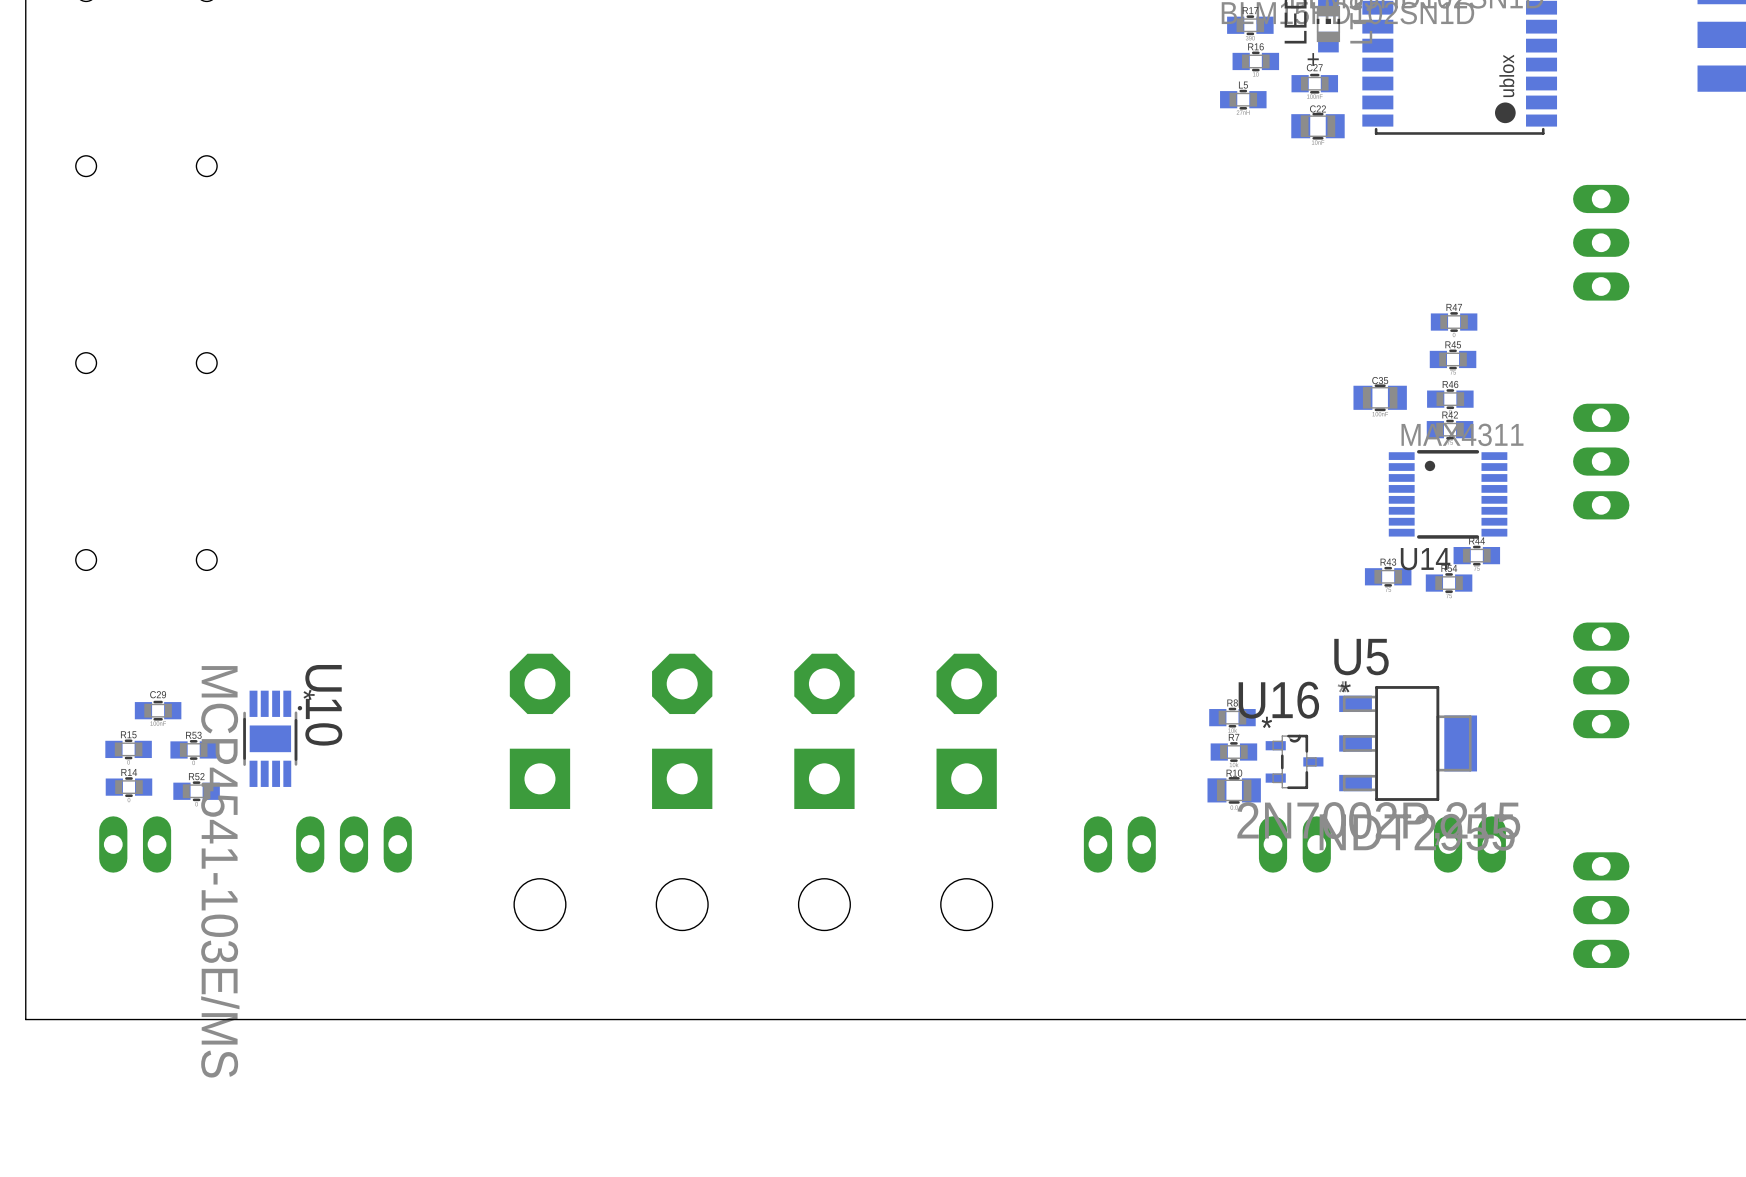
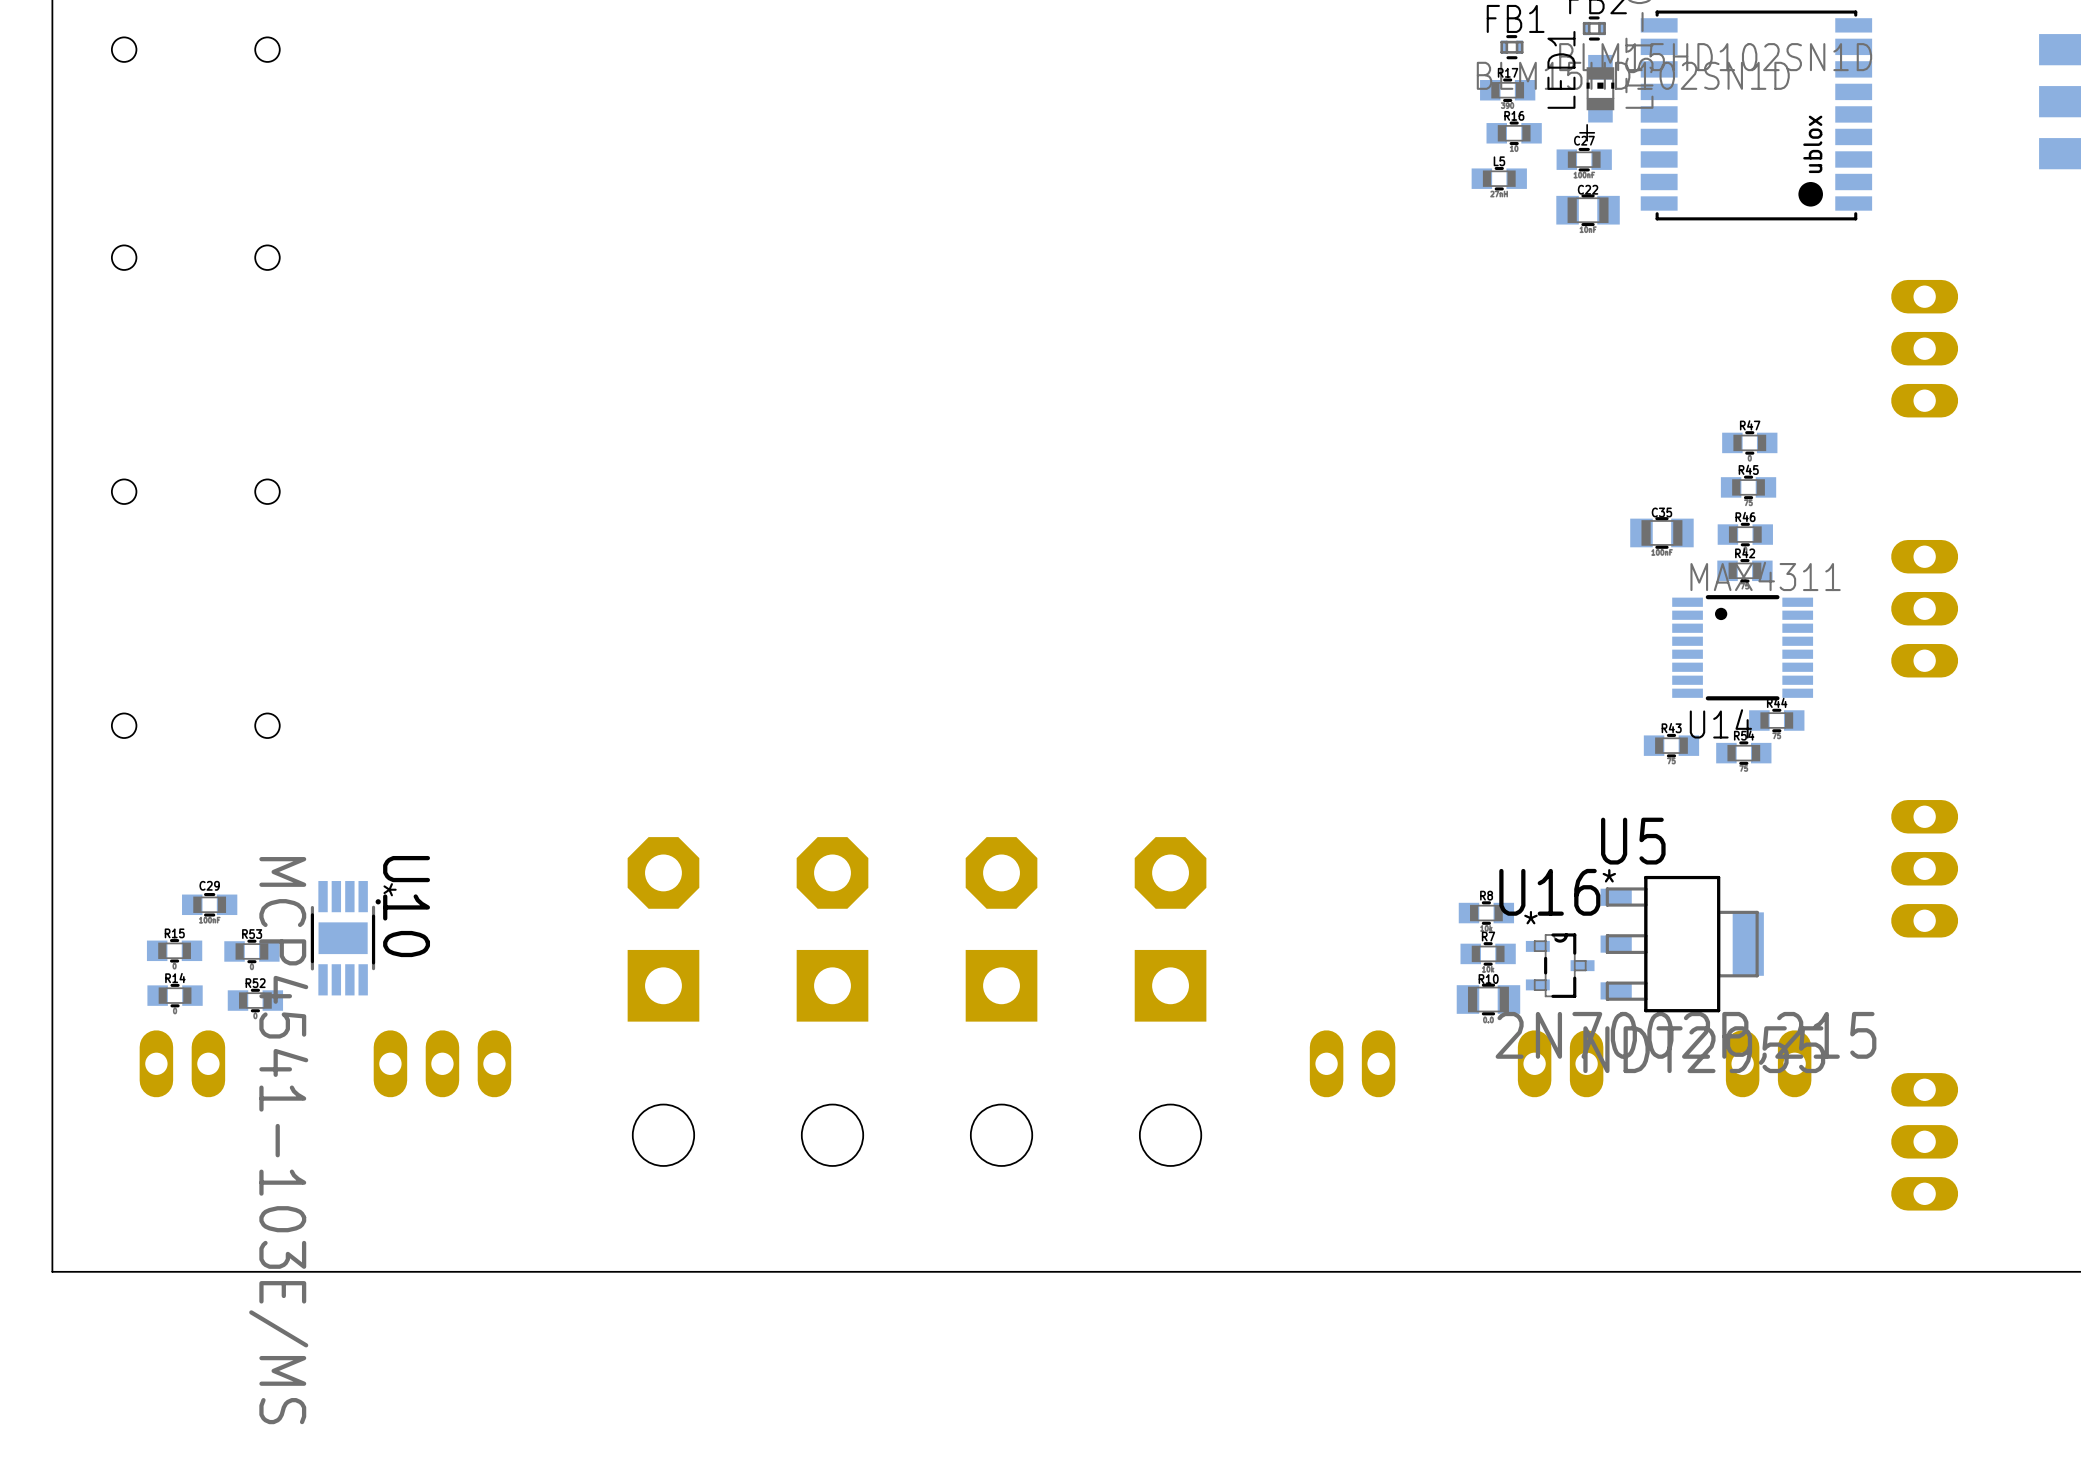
U5 footprint: [1339, 686, 1478, 801] -> [1600, 875, 1764, 1013]

